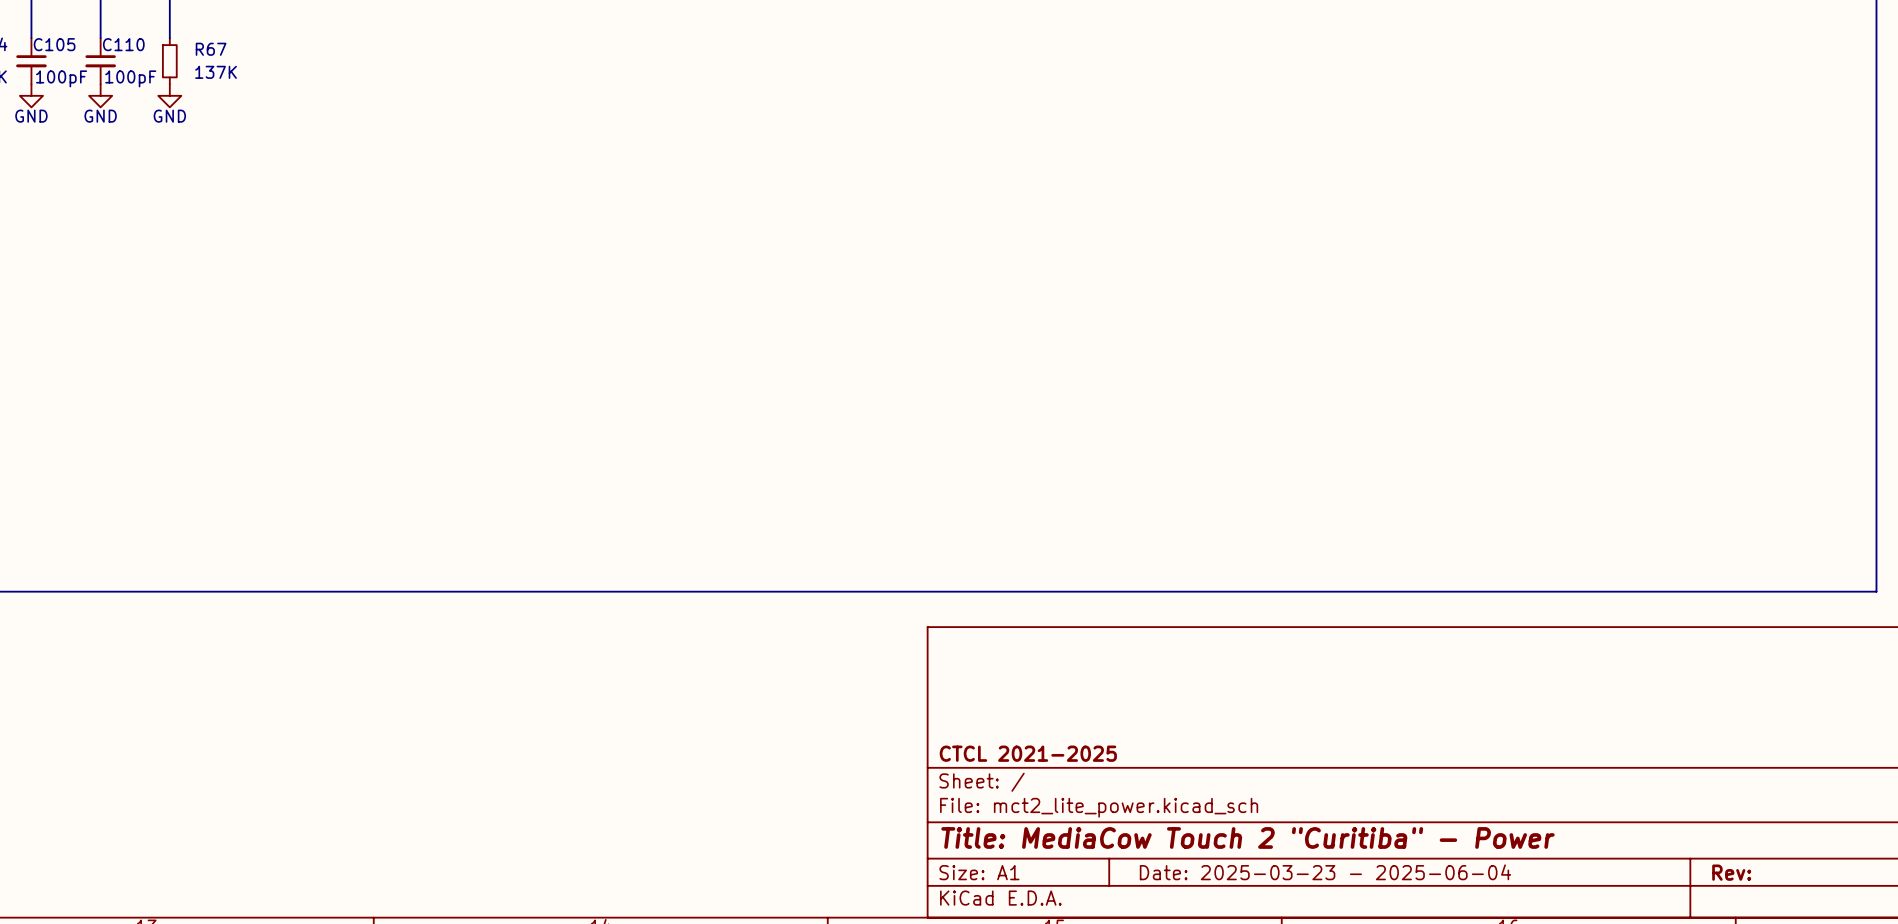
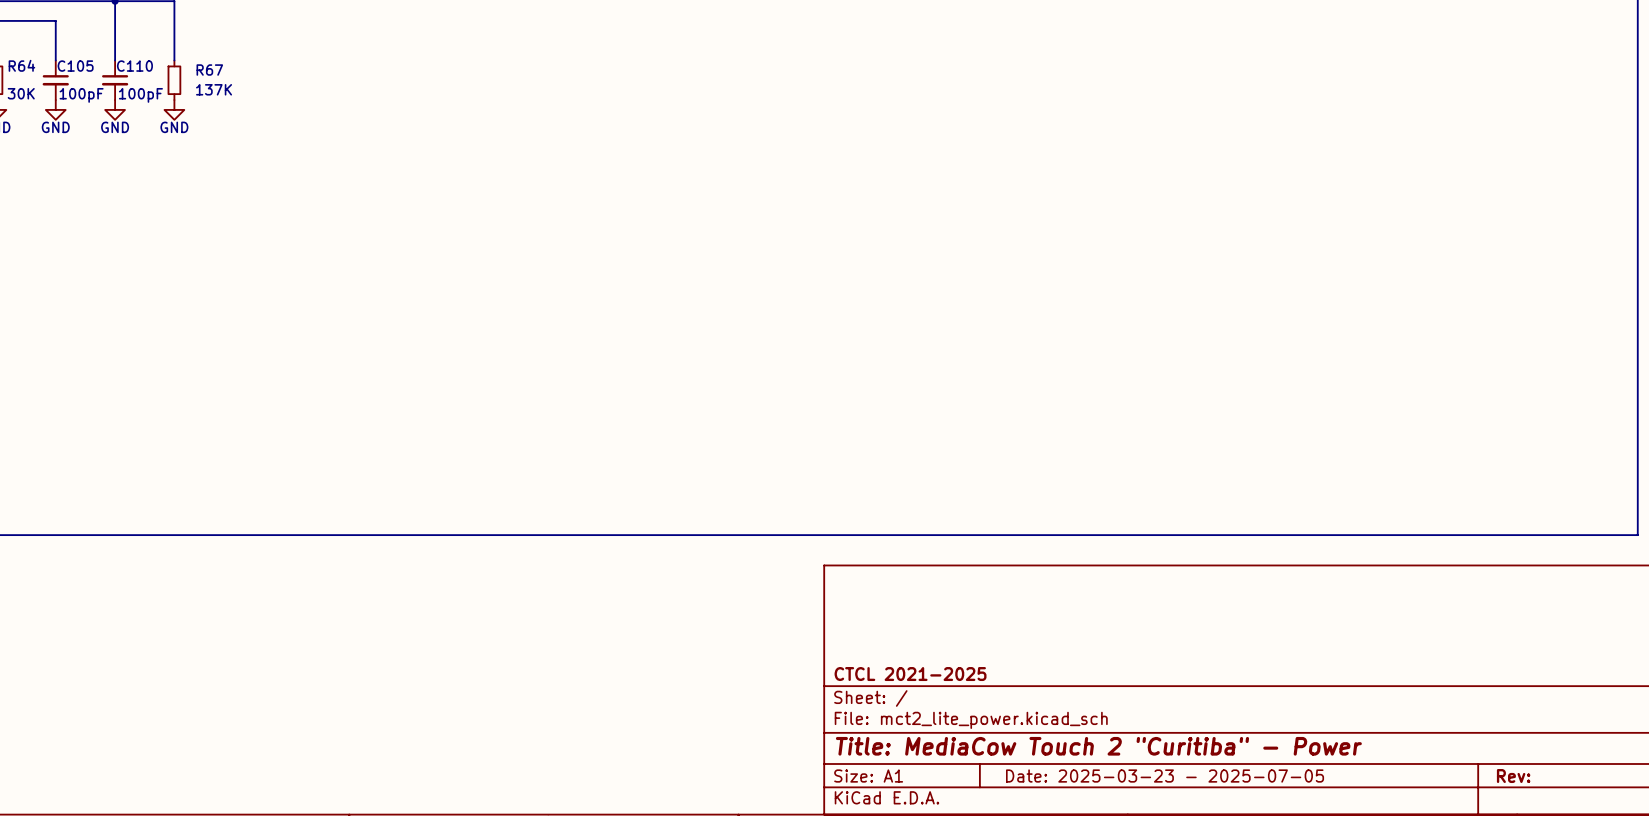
title block: Date: 2025-03-23 - 2025-06-04 (1325, 872) -> Date: 2025-03-23 - 2025-07-05 (1165, 776)

